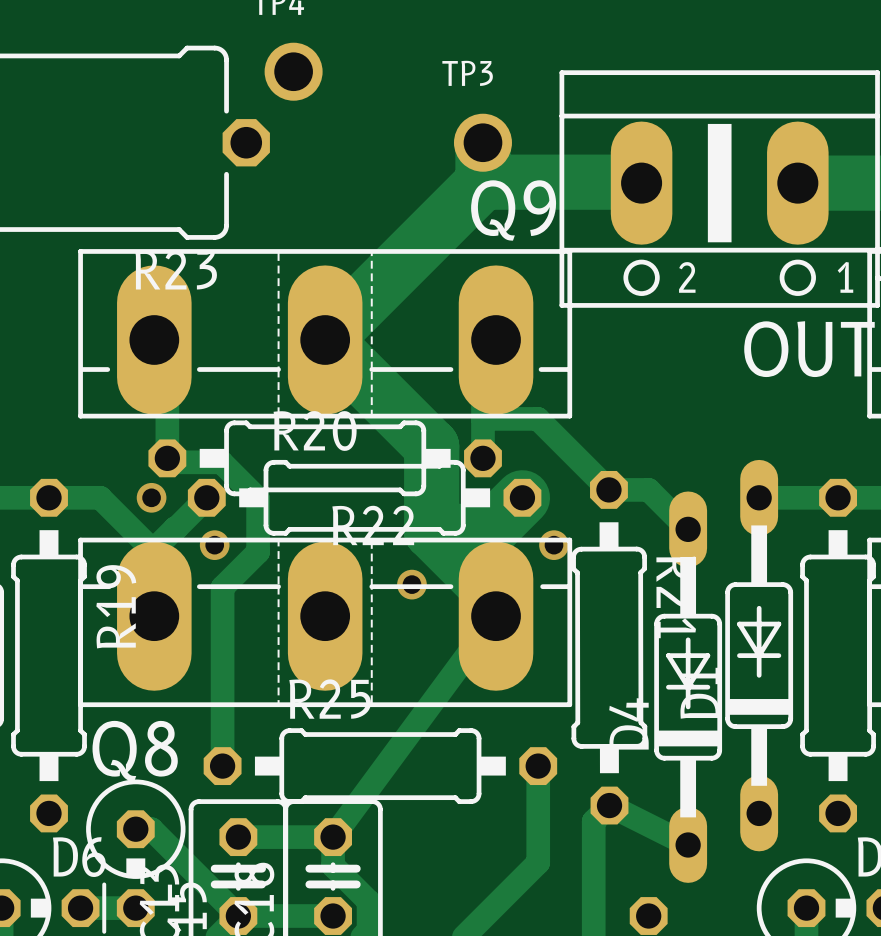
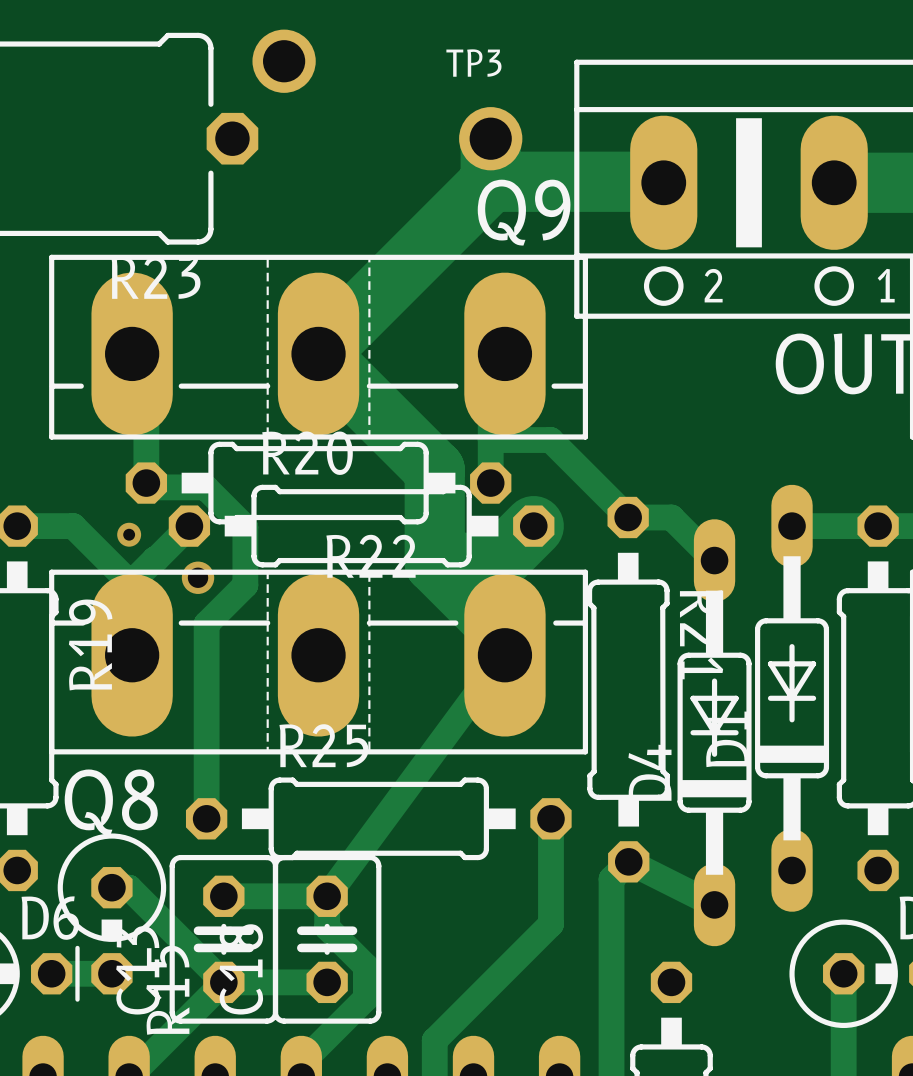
via size: [136, 482, 167, 513] -> [117, 522, 142, 547]
via: (554, 545) -> none
via: (411, 584) -> none

